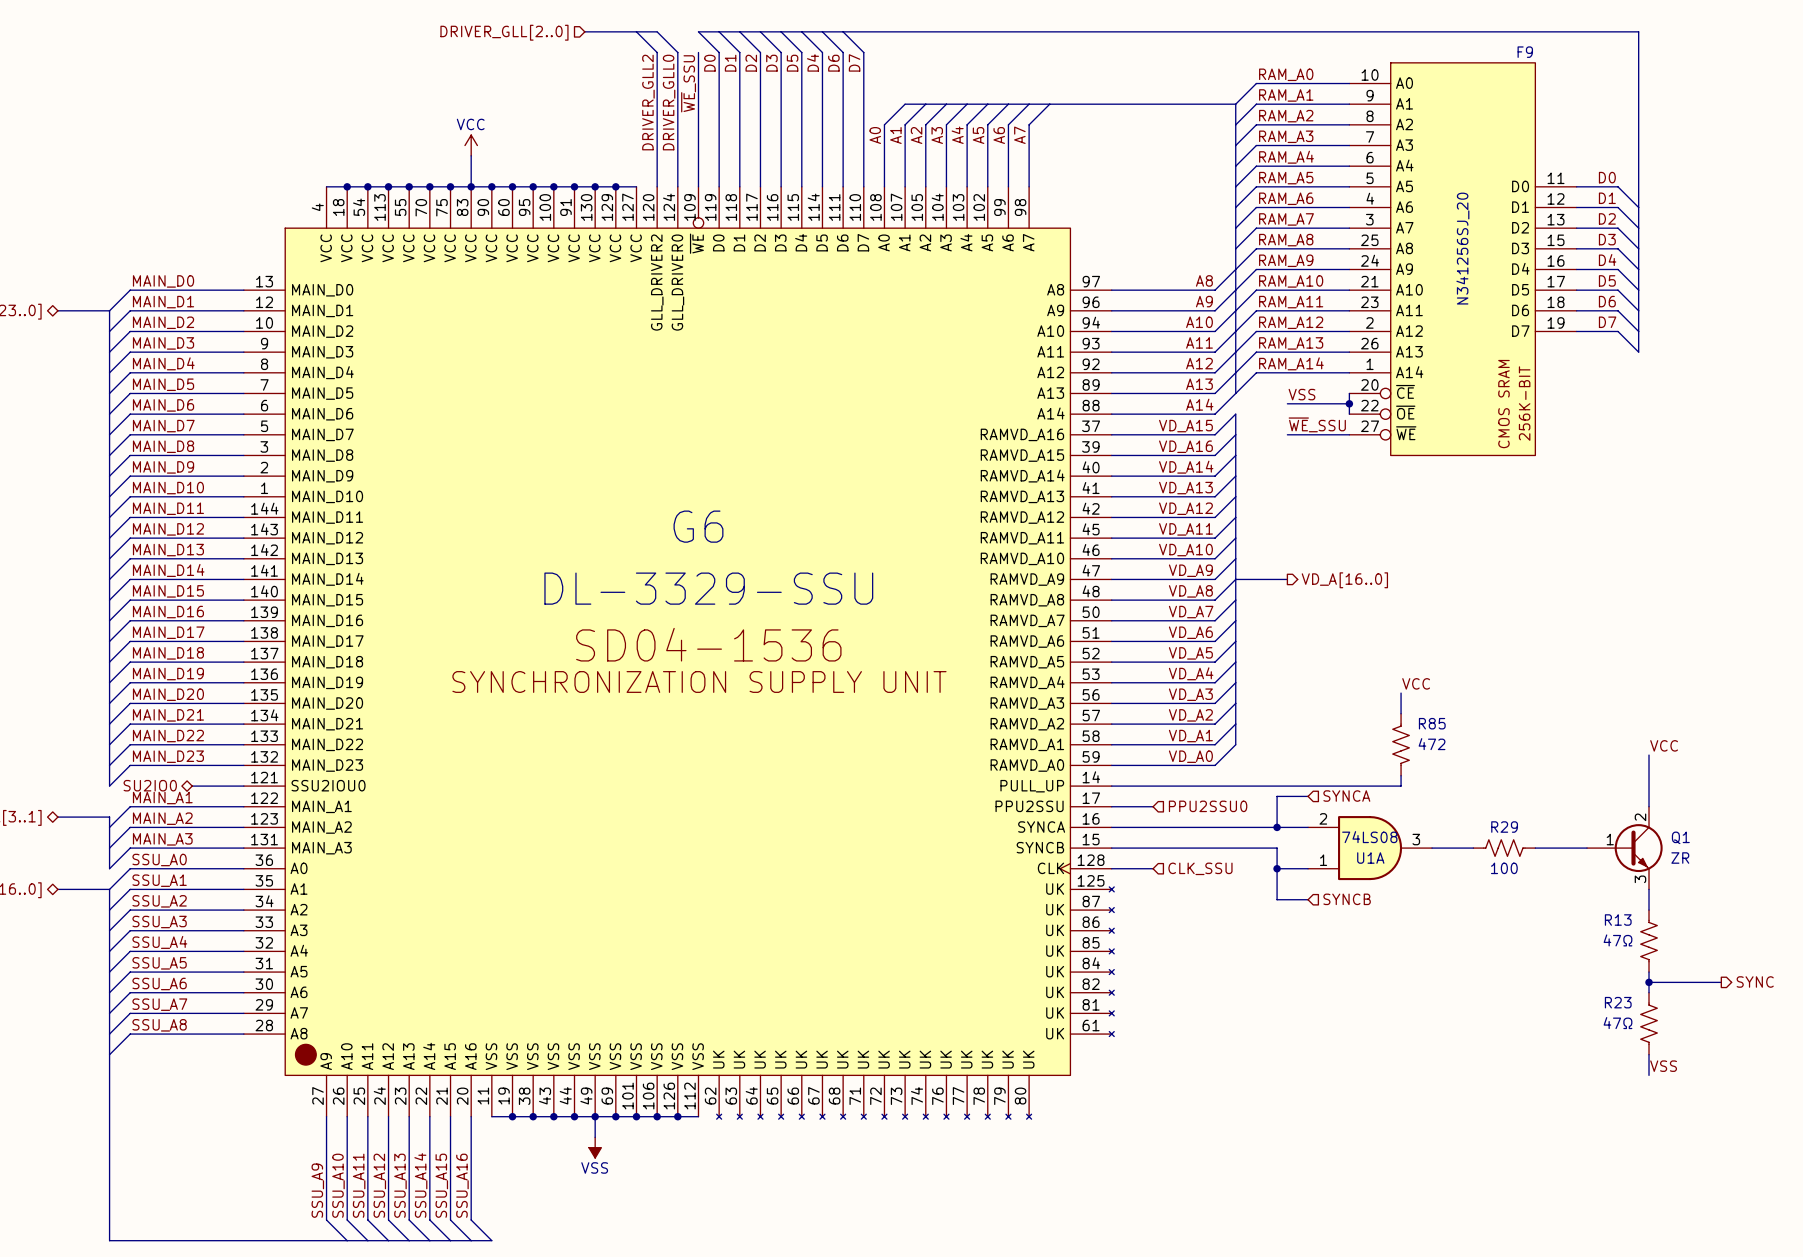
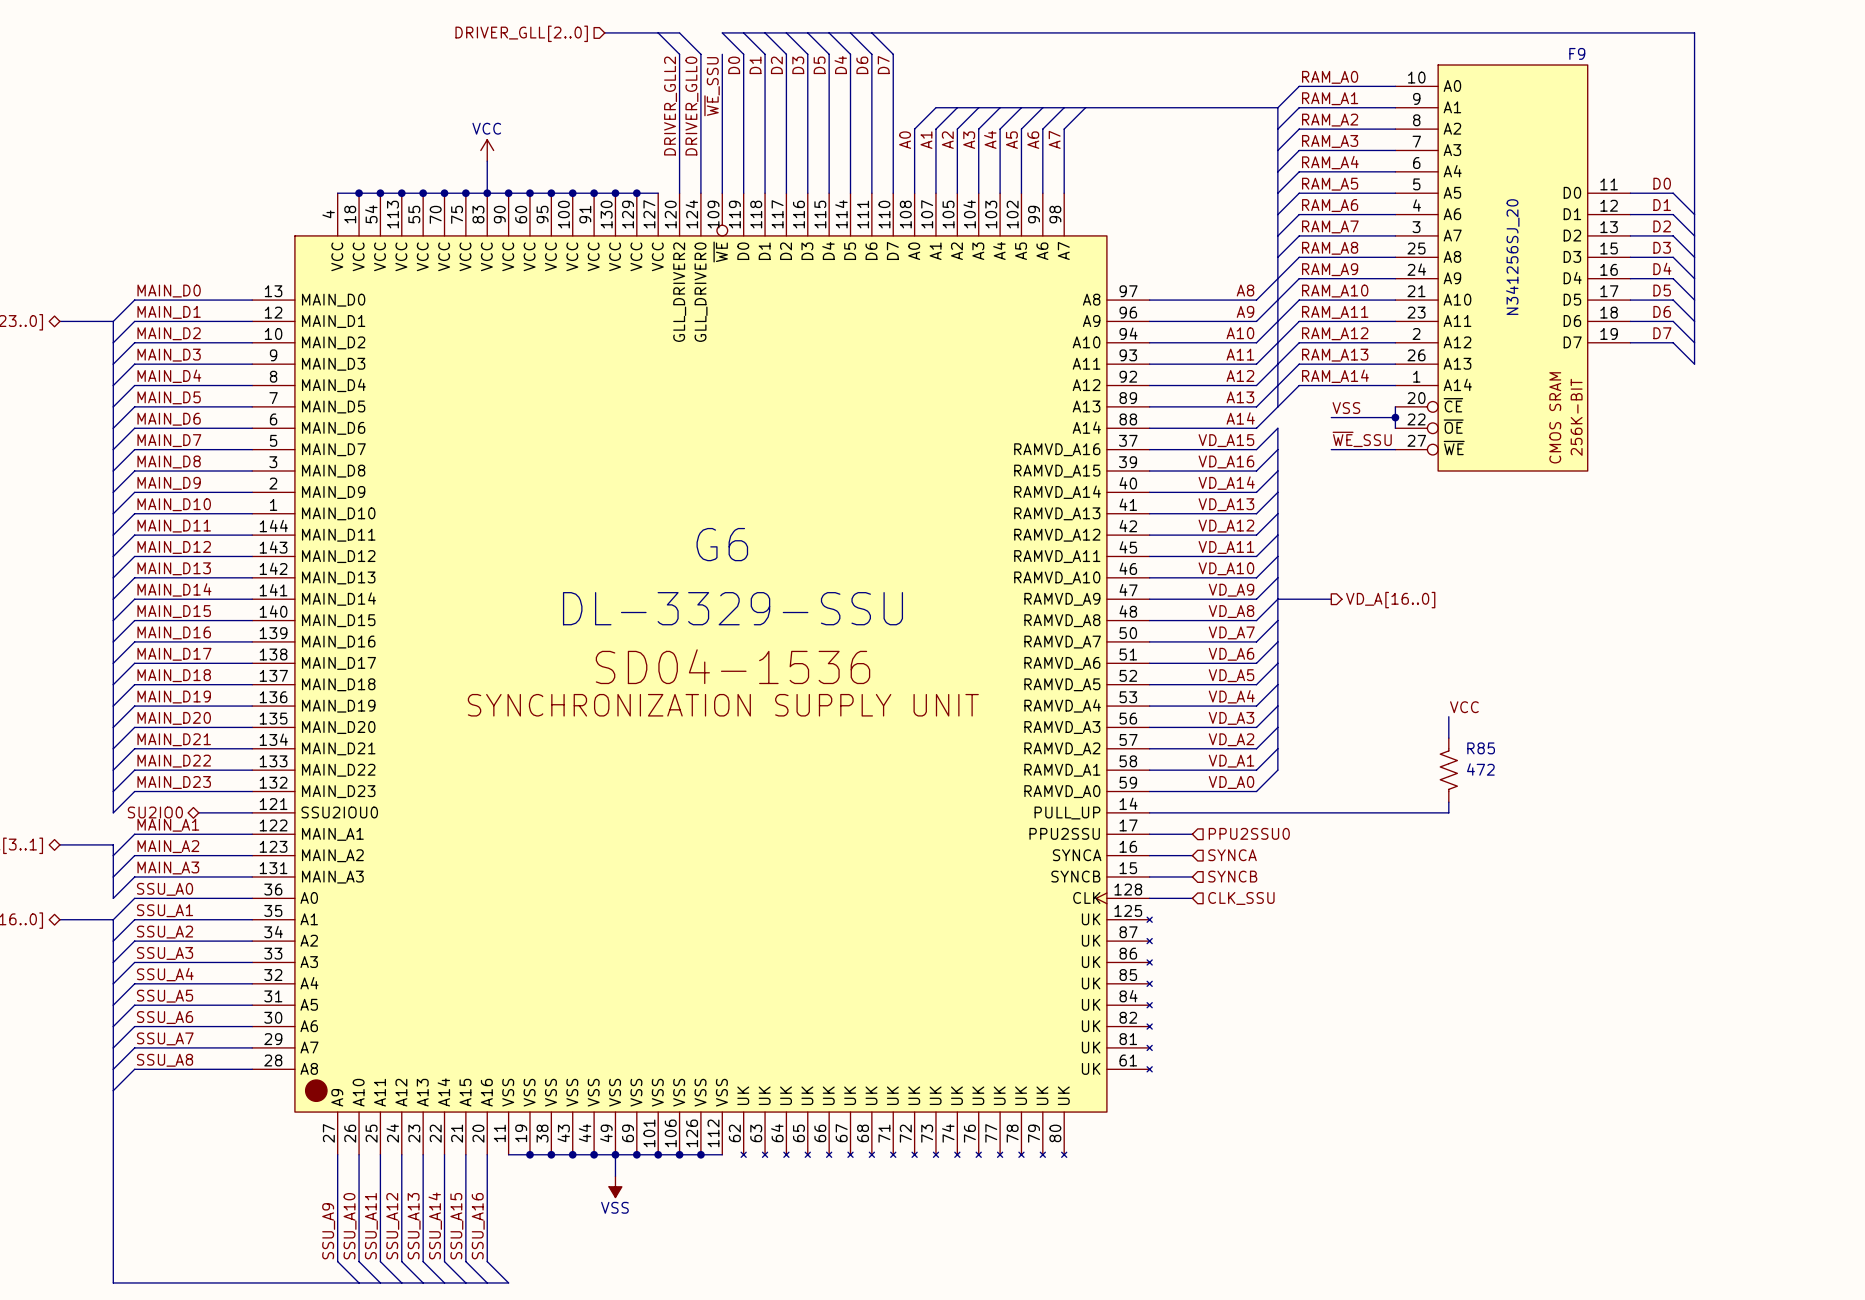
label: VCC (1664, 745) -> none
wire: (1649, 755) (1649, 806) -> none
wire: (1308, 796) (1277, 796) (1277, 827) -> none
hierarchical label position: SYNCA (1346, 796) -> SYNCA (1232, 855)
wire: (1153, 827) (1308, 827) -> none
junction: (1277, 827) -> none
wire: (1153, 848) (1277, 848) (1277, 899) (1308, 899) -> none
U1A: 74LS08 (1370, 848) -> none
wire: (1432, 848) (1473, 848) -> none
R29: 100 (1504, 848) -> none
wire: (1535, 848) (1587, 848) -> none
Q1: ZR (1624, 848) -> none
wire: (1277, 868) (1308, 868) -> none
junction: (1277, 868) -> none
wire: (1649, 889) (1649, 910) -> none
hierarchical label position: SYNCB (1347, 899) -> SYNCB (1232, 876)
R13: 47Ω (1649, 941) -> none
wire: (1649, 972) (1649, 992) -> none
wire: (1649, 982) (1721, 982) -> none
junction: (1649, 982) -> none
hierarchical label: SYNC (1755, 982) -> none
R23: 47Ω (1649, 1023) -> none
wire: (1649, 1054) (1649, 1075) -> none
label: VSS (1663, 1066) -> none

